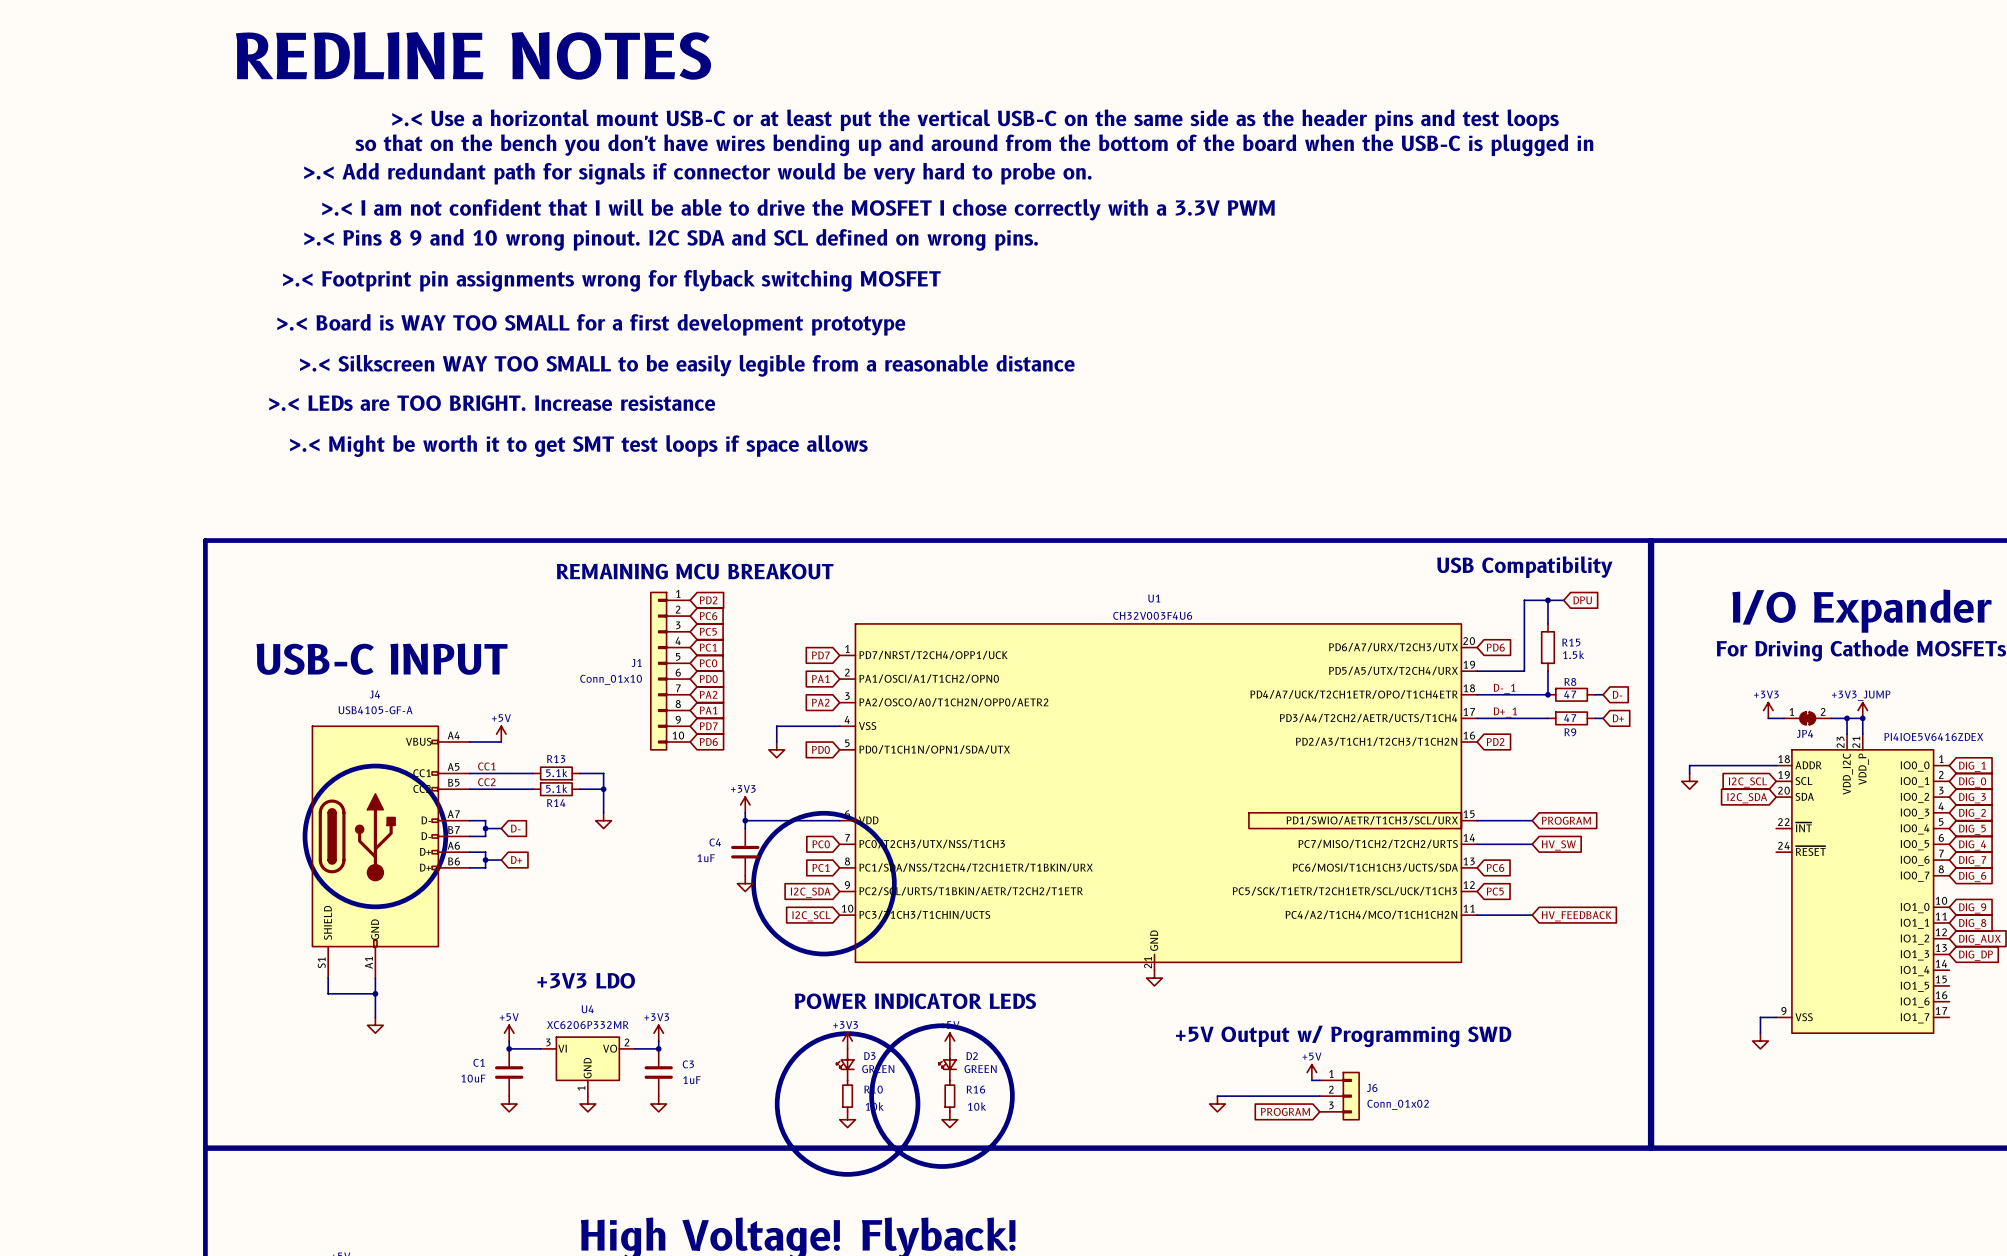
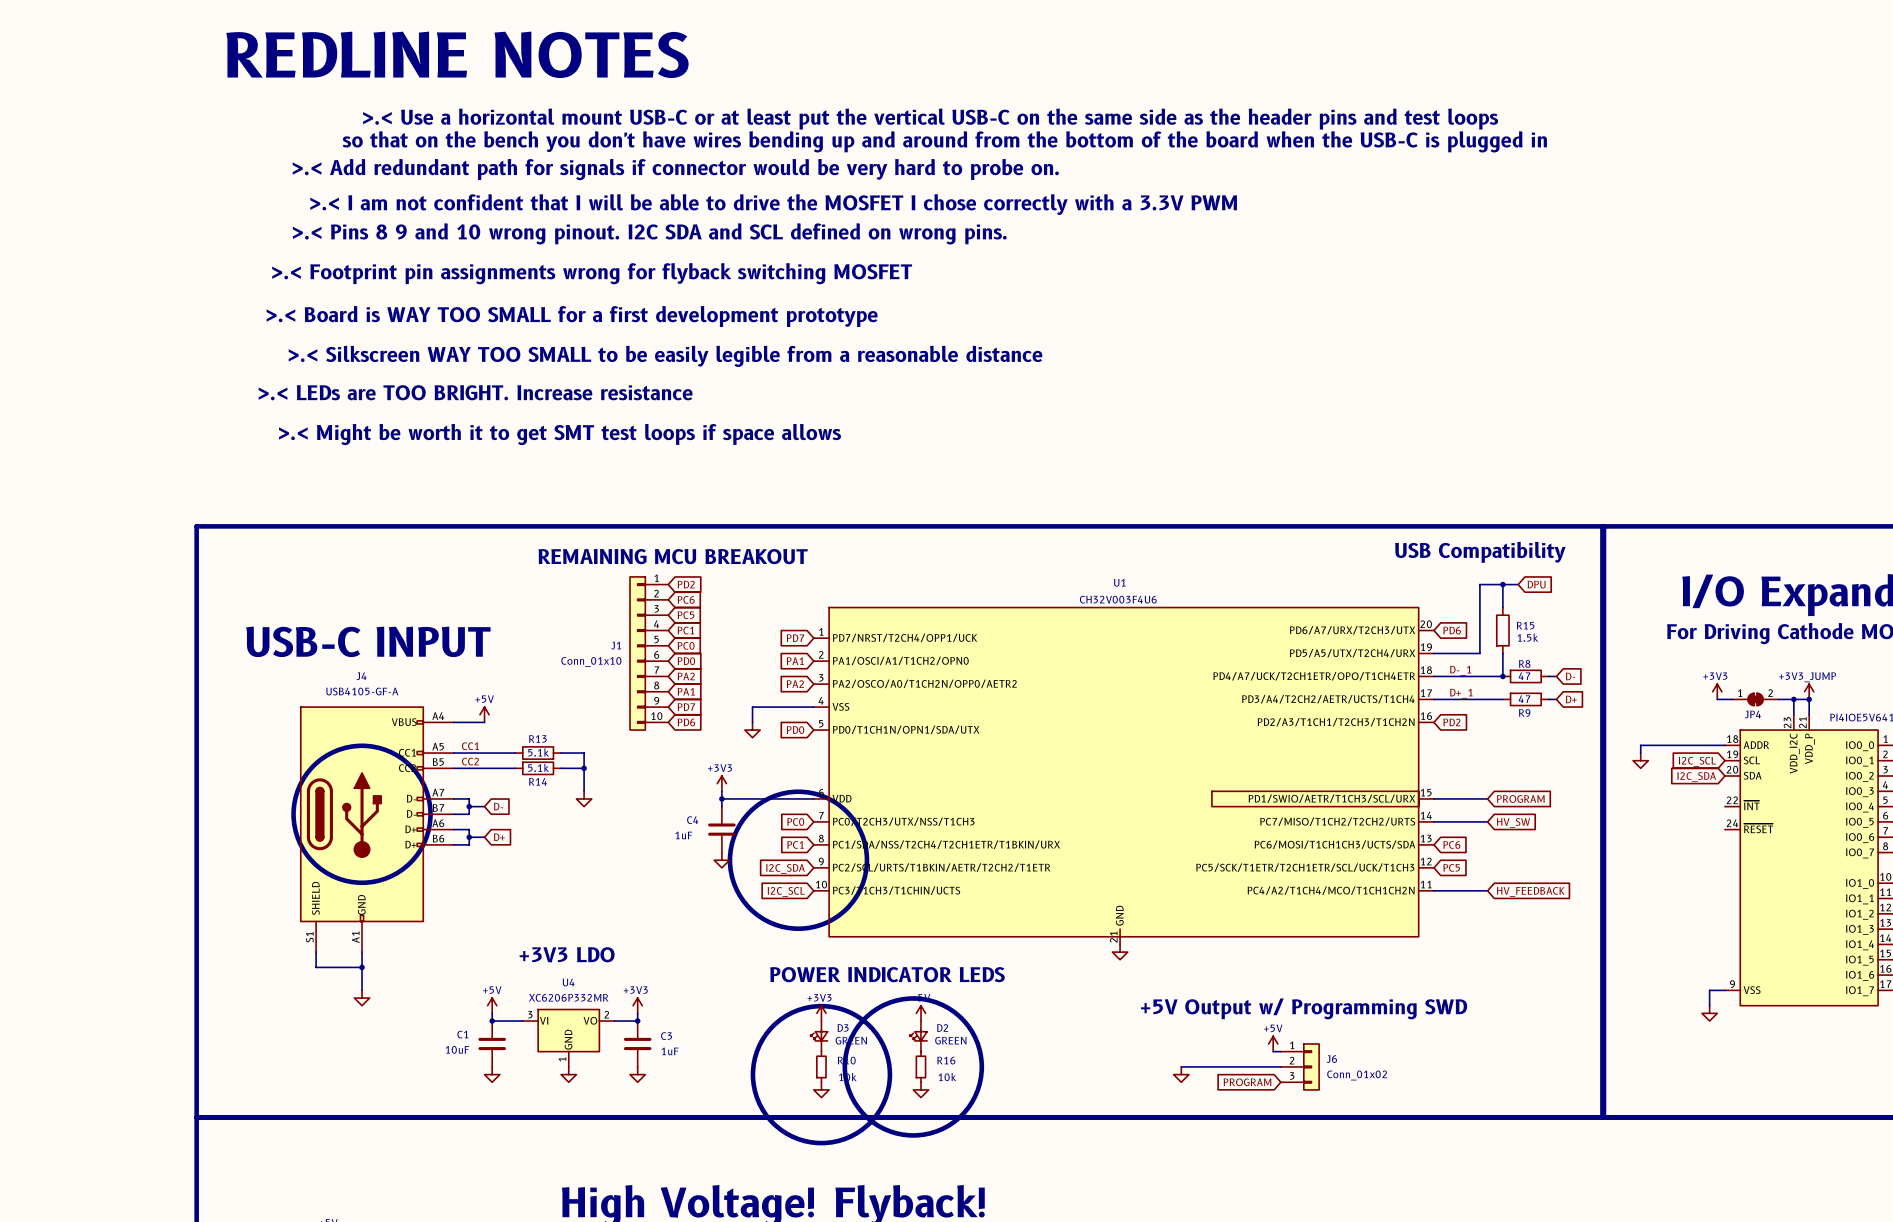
text position: >.< Use a horizontal mount USB-C or at least put the vertical USB-C on the same side as the header pins and test loops (975, 120) -> >.< Use a horizontal mount USB-C or at least put the vertical USB-C on the same side as the header pins and test loops (930, 119)

